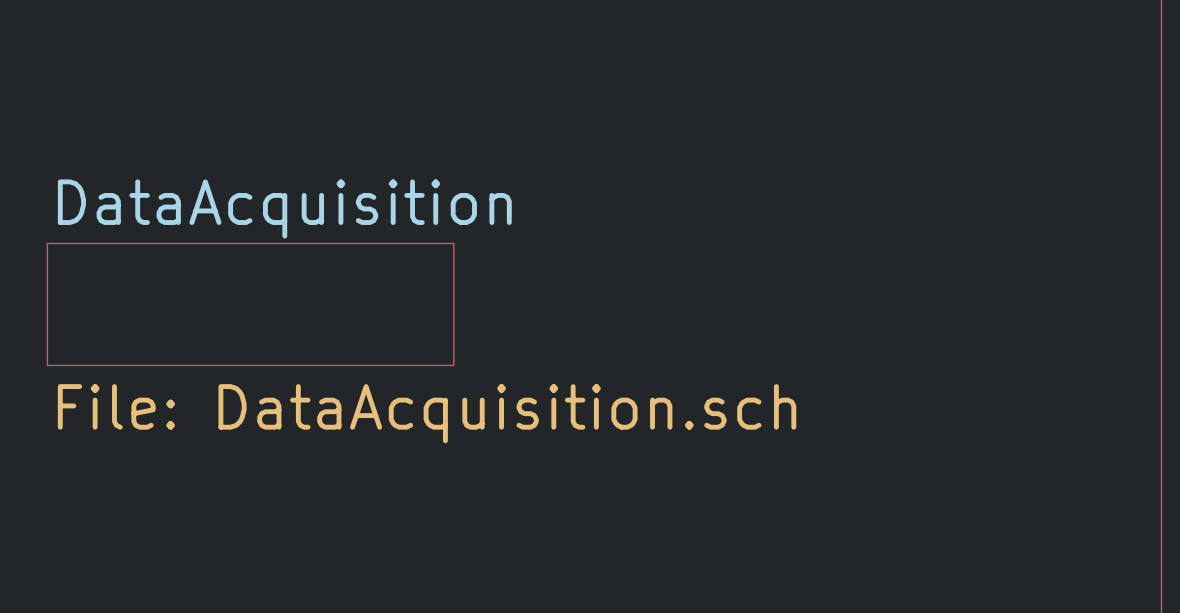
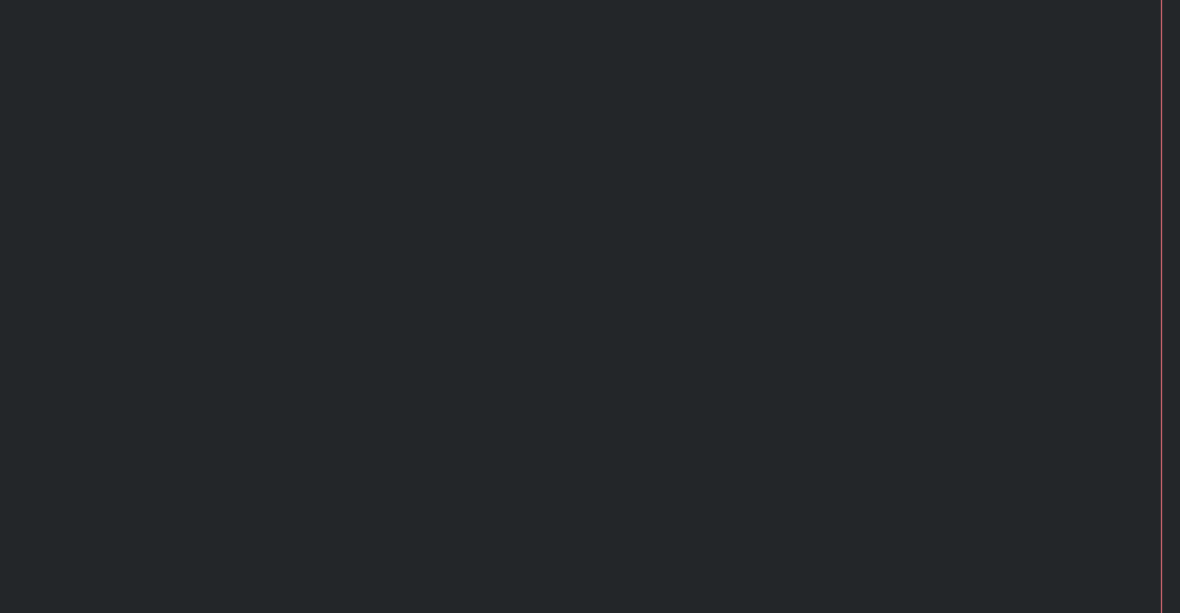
sheet DataAcquisition: File: DataAcquisition.sch (250, 304) -> none

